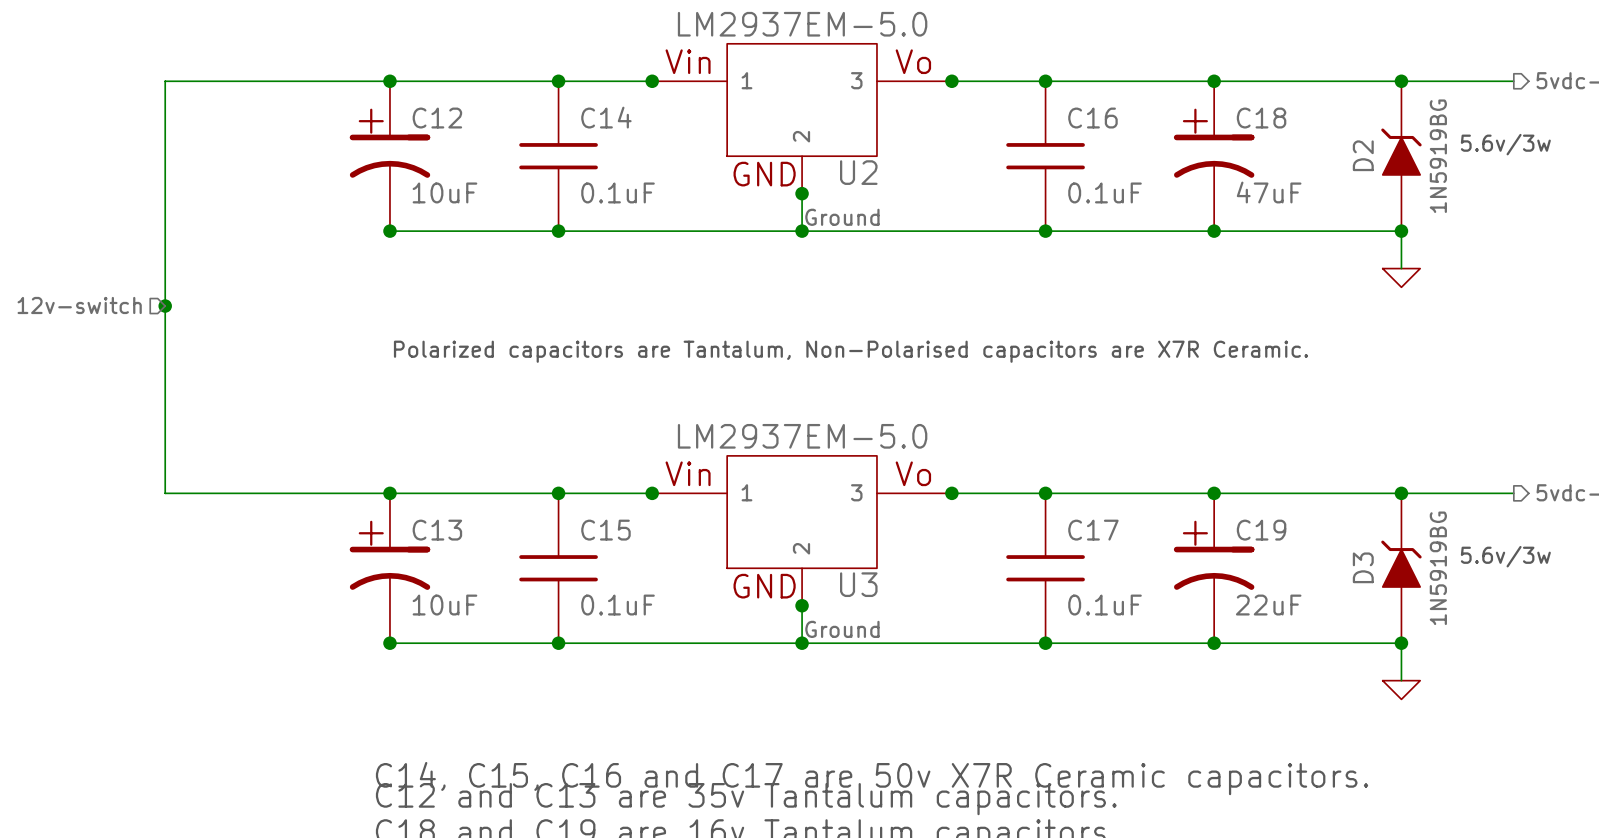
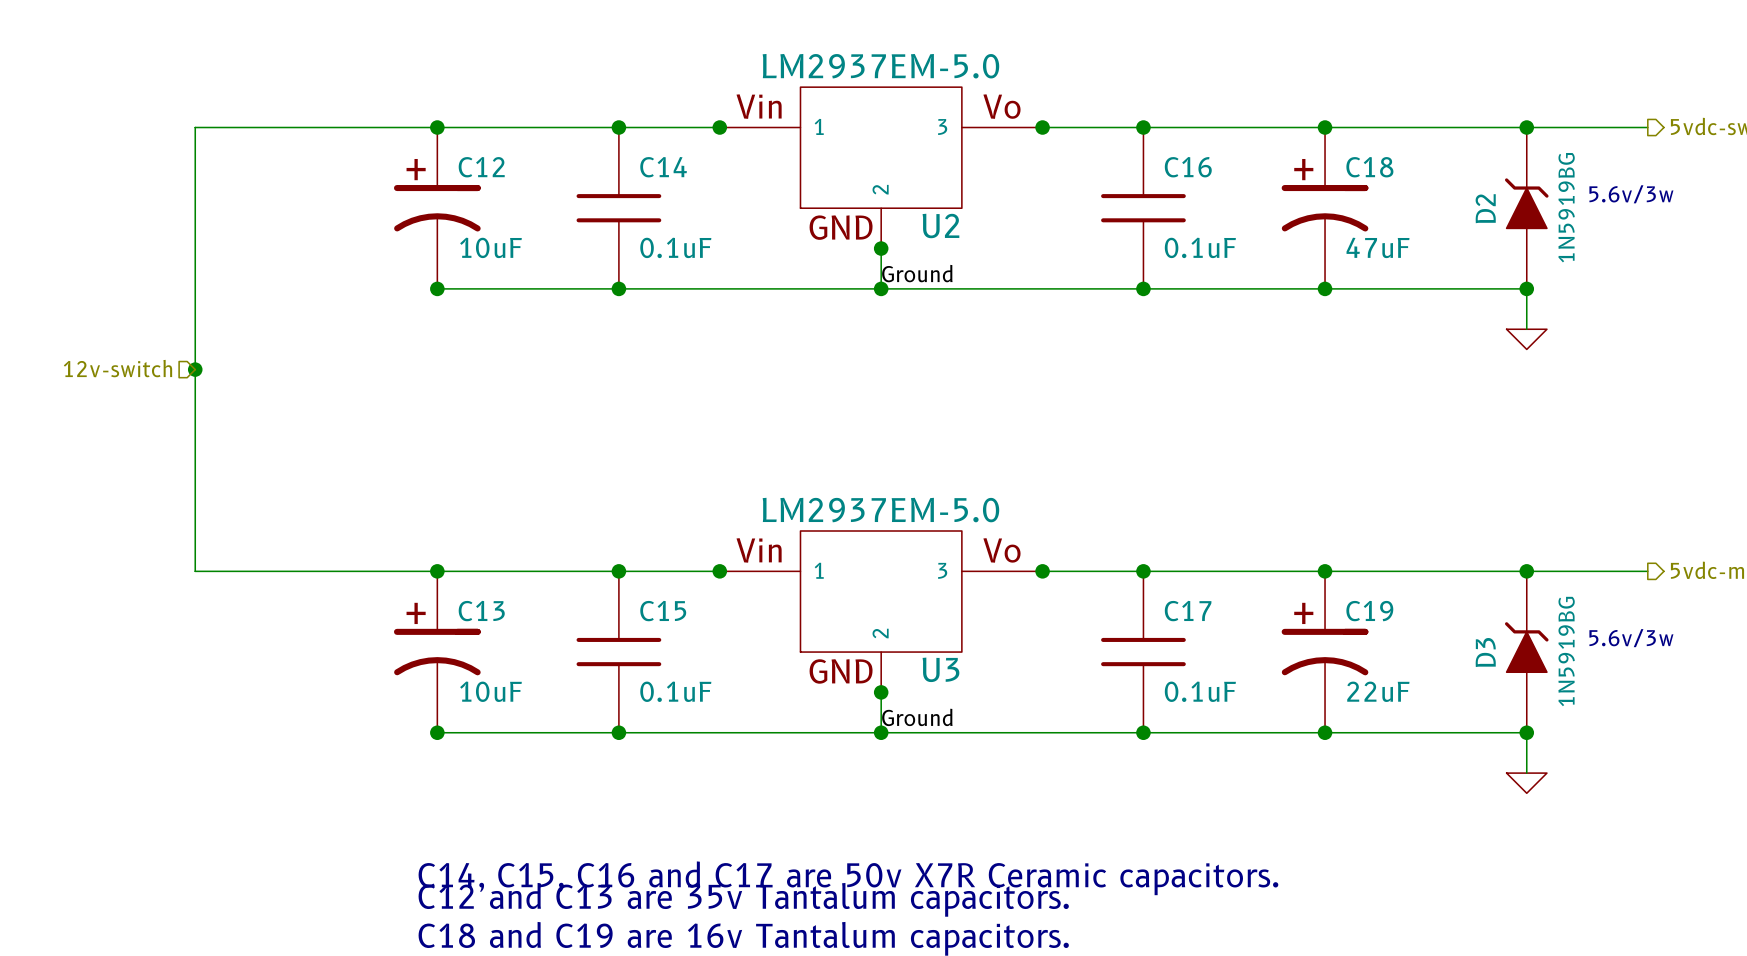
text: Polarized capacitors are Tantalum, Non-Polarised capacitors are X7R Ceramic. (850, 351) -> none

